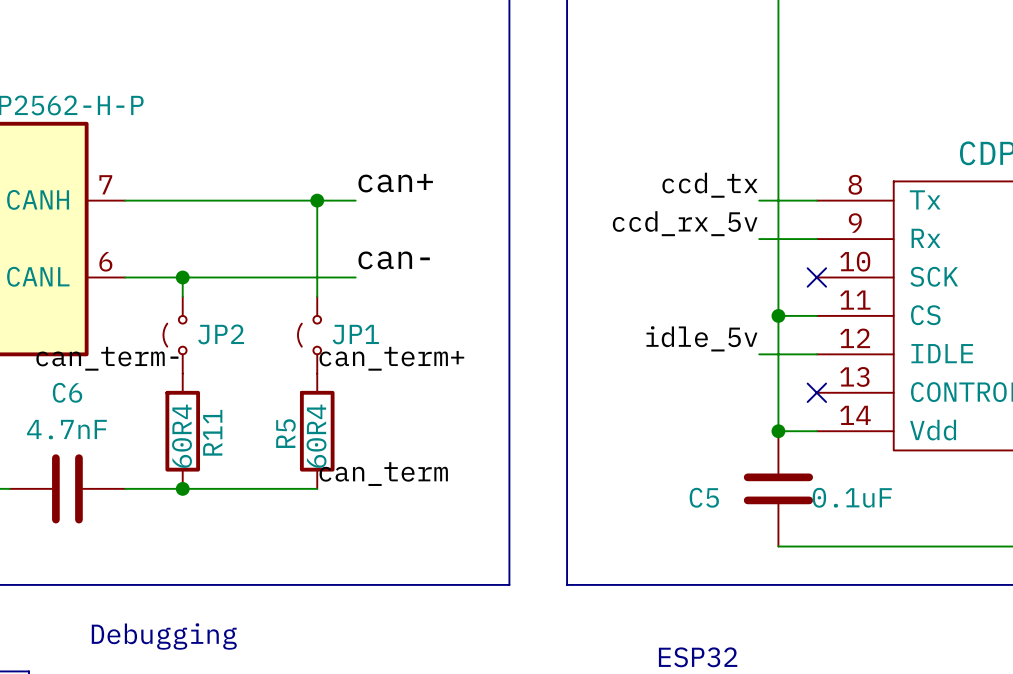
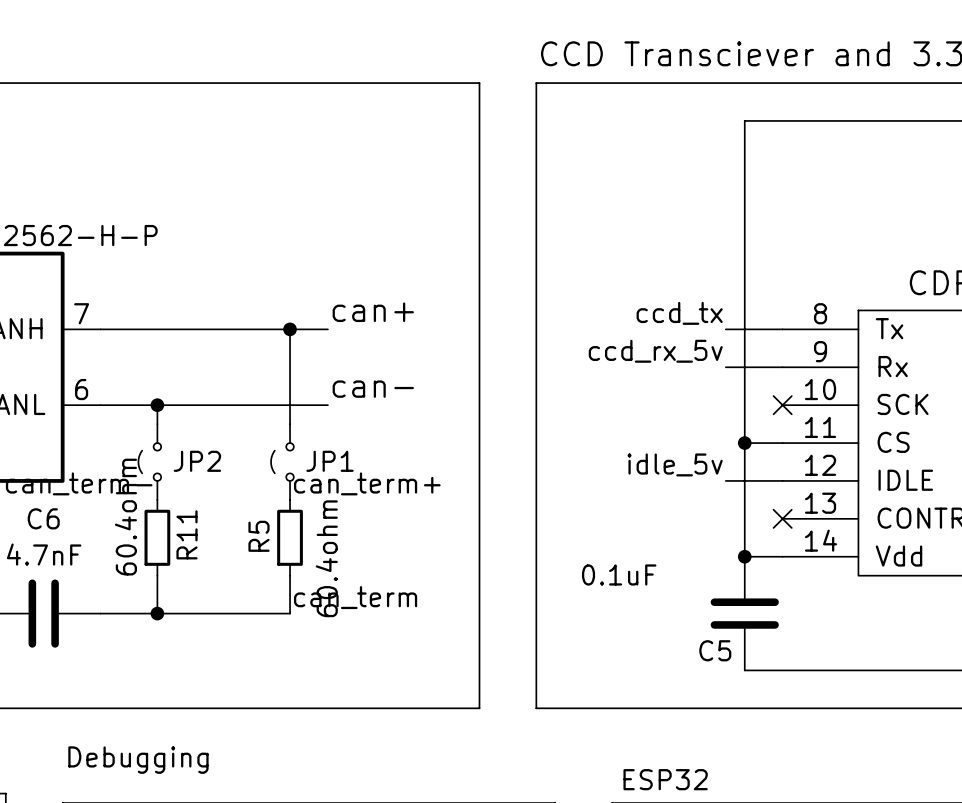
R11 symbol: [165, 373, 201, 489] -> [144, 499, 171, 576]
R5 symbol: [299, 373, 335, 489] -> [277, 499, 303, 576]
R11 value: 60R4 (182, 436) -> 60.4ohm (125, 517)
R5 value: 60R4 (316, 436) -> 60.4ohm (326, 558)
C5 name position: C5 (704, 497) -> C5 (715, 650)
C5 value position: 0.1uF (852, 497) -> 0.1uF (619, 574)

